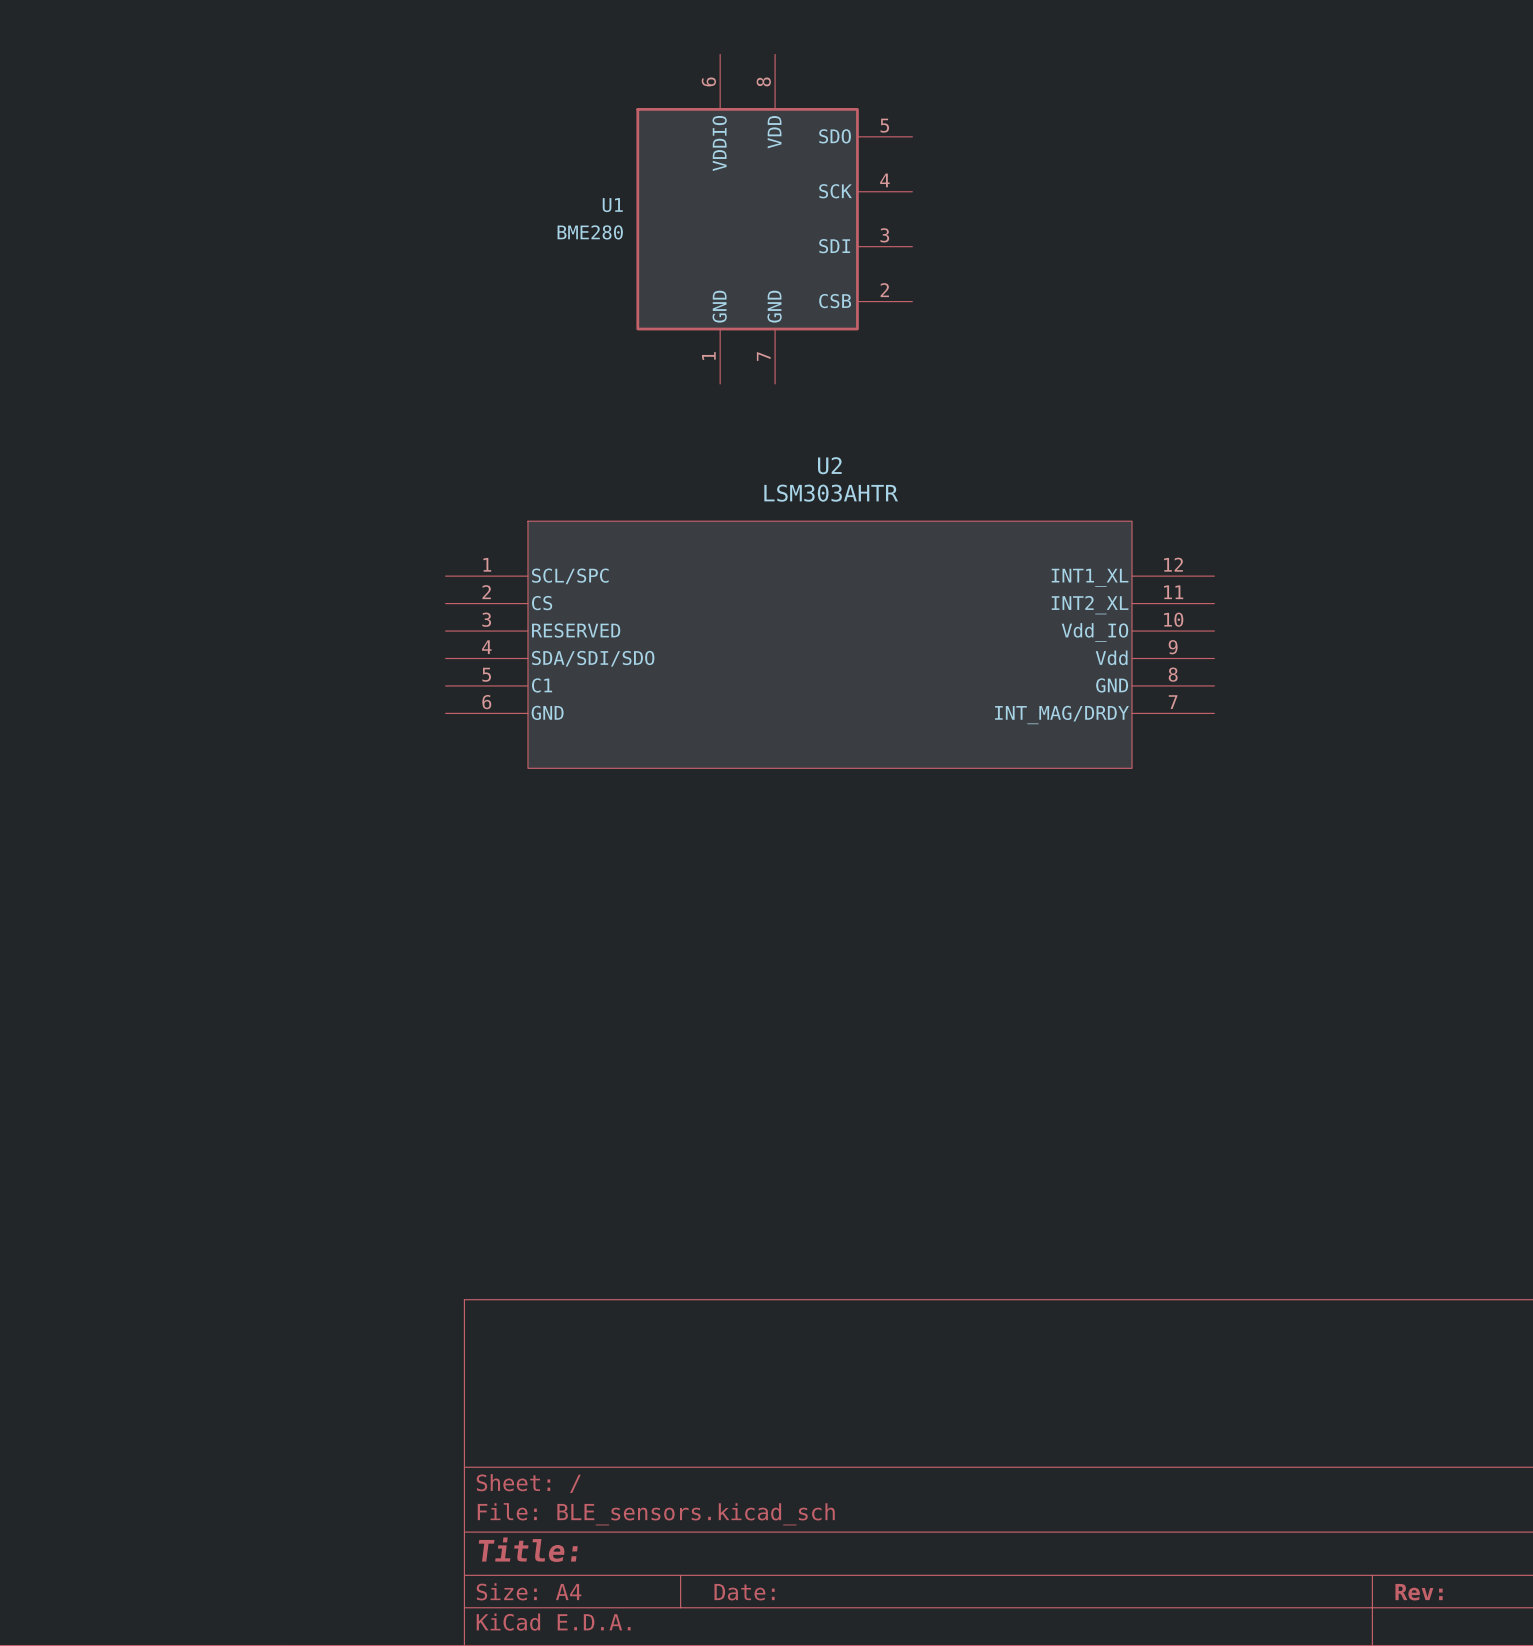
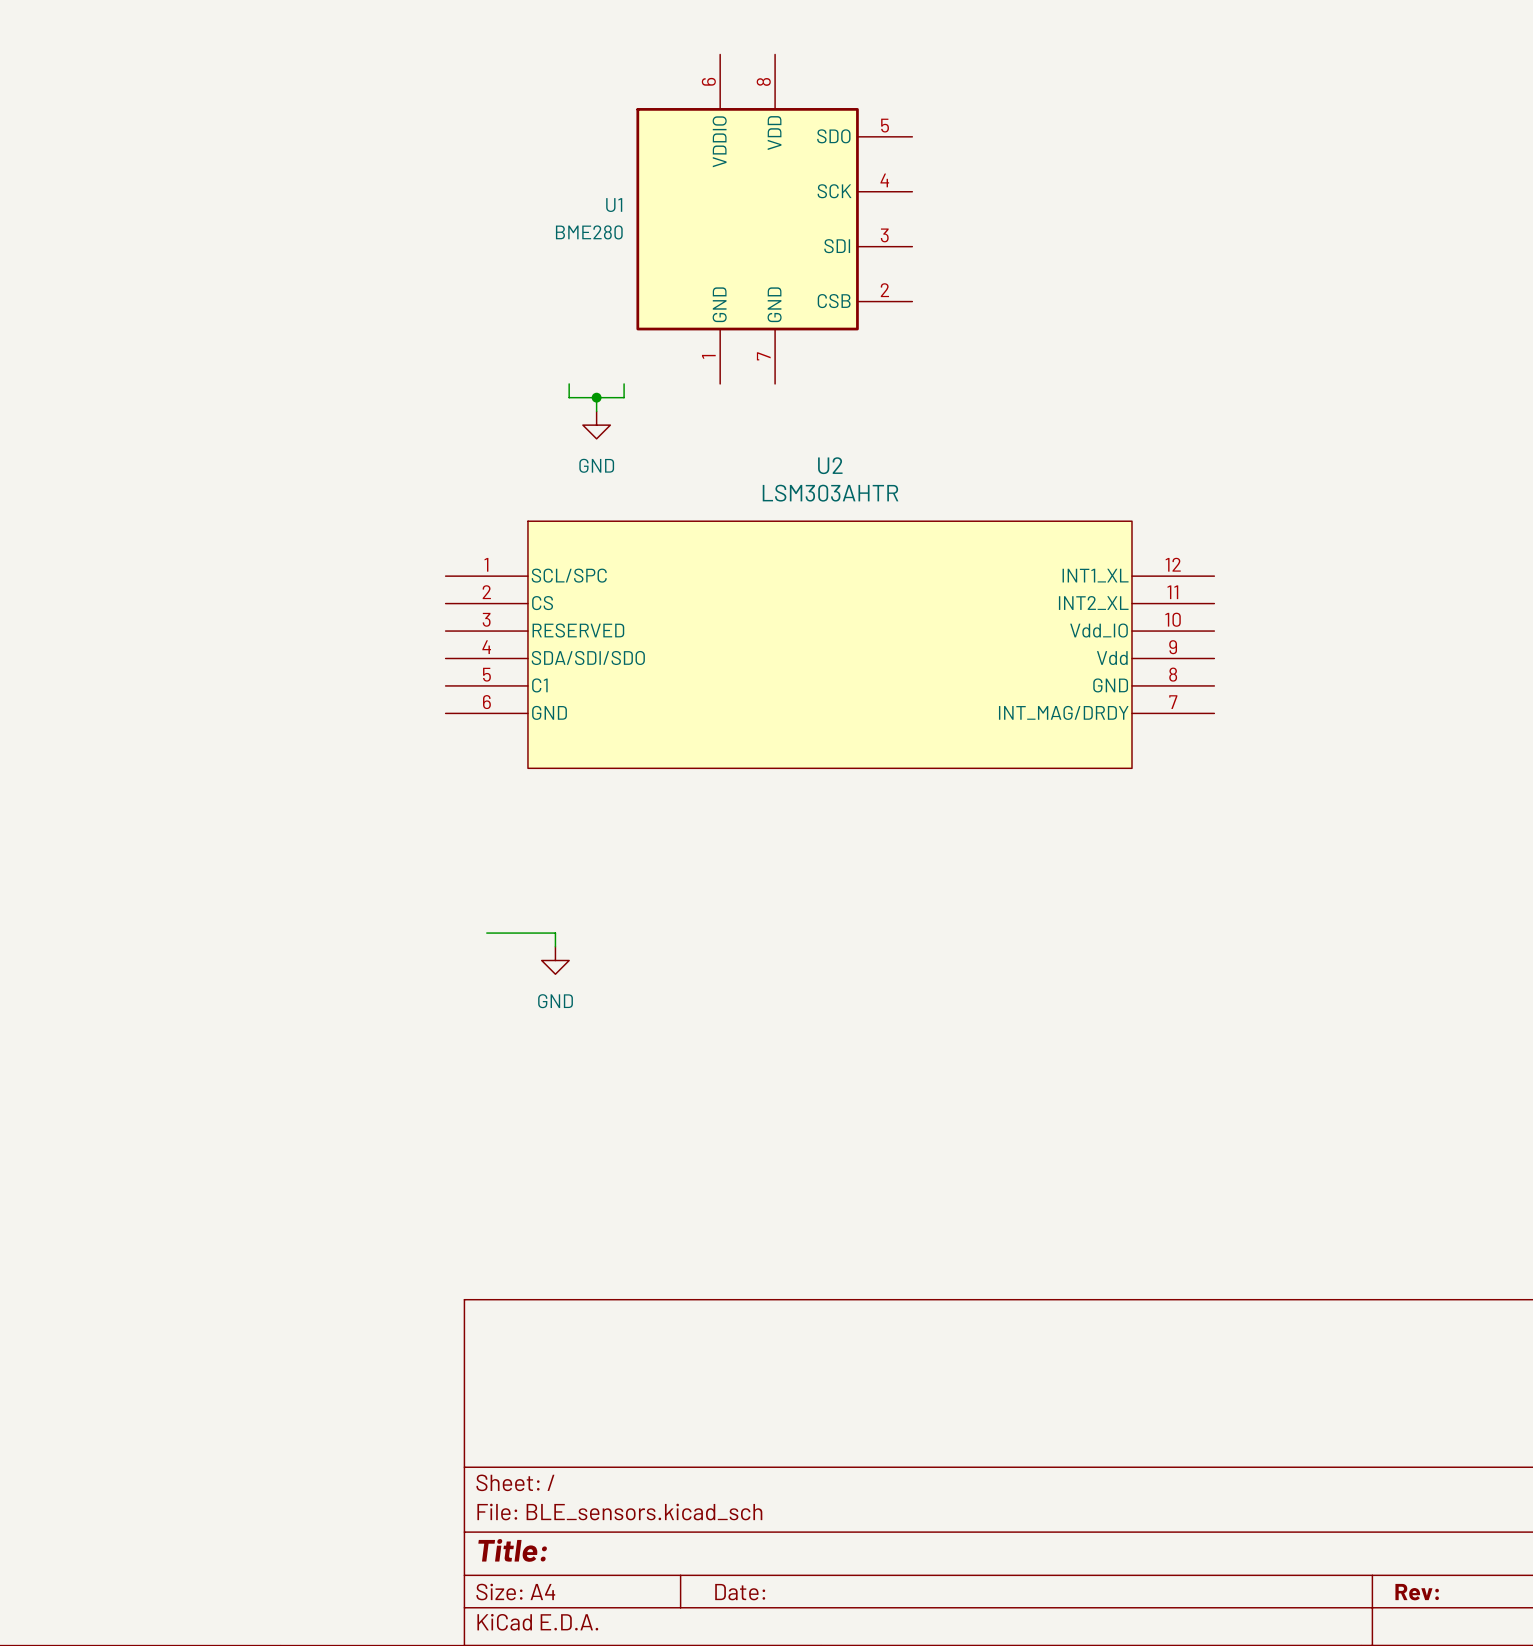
wire: none -> (569, 383) (569, 397) (624, 397) (624, 383)
wire: none -> (596, 397) (596, 411)
junction: none -> (596, 397)
power symbol: none -> GND (596, 425)
wire: none -> (486, 933) (555, 933) (555, 946)
power symbol: none -> GND (555, 960)

